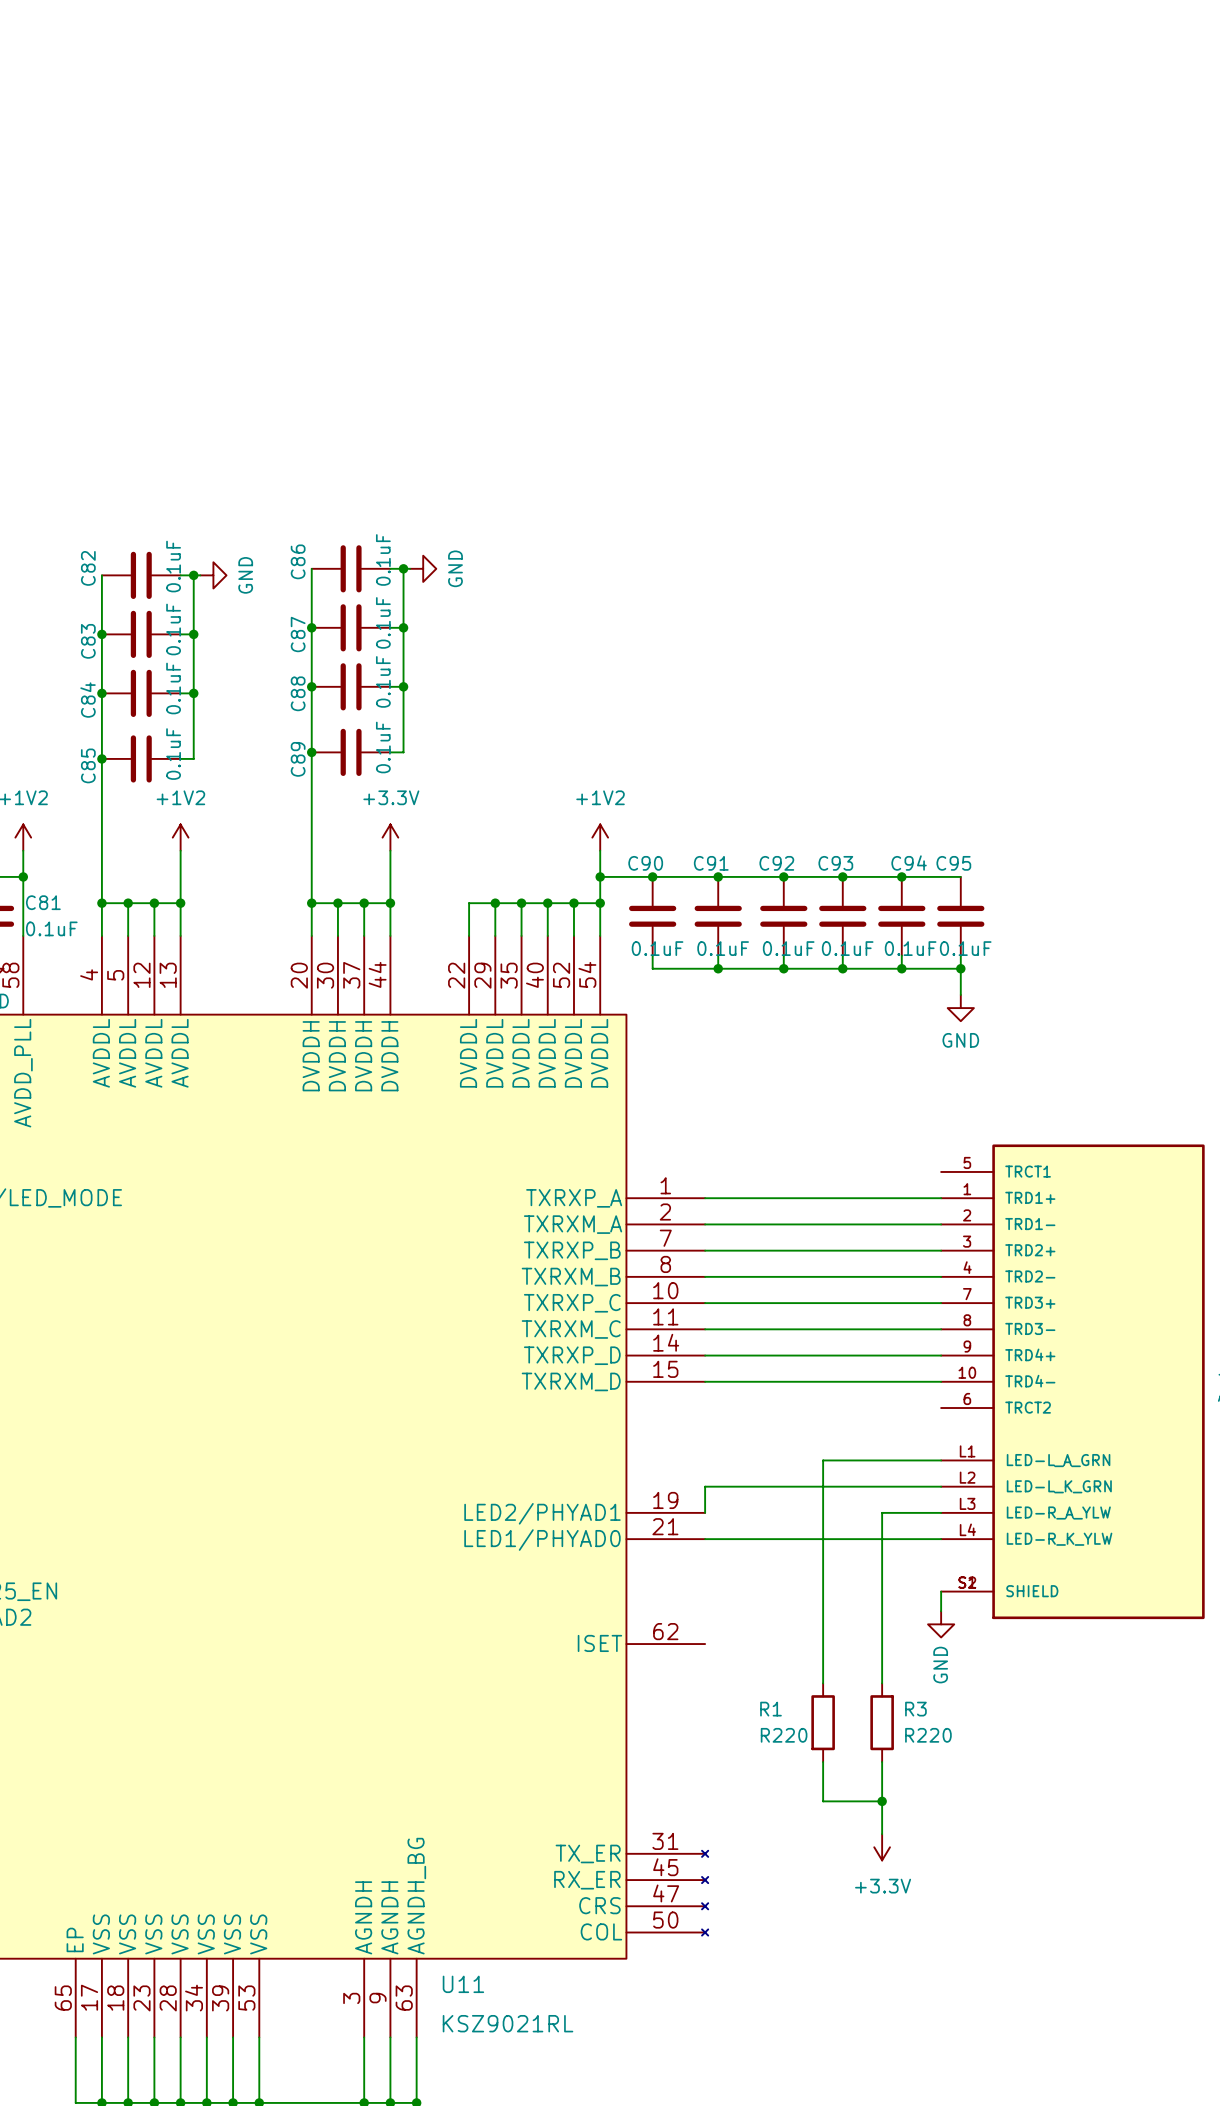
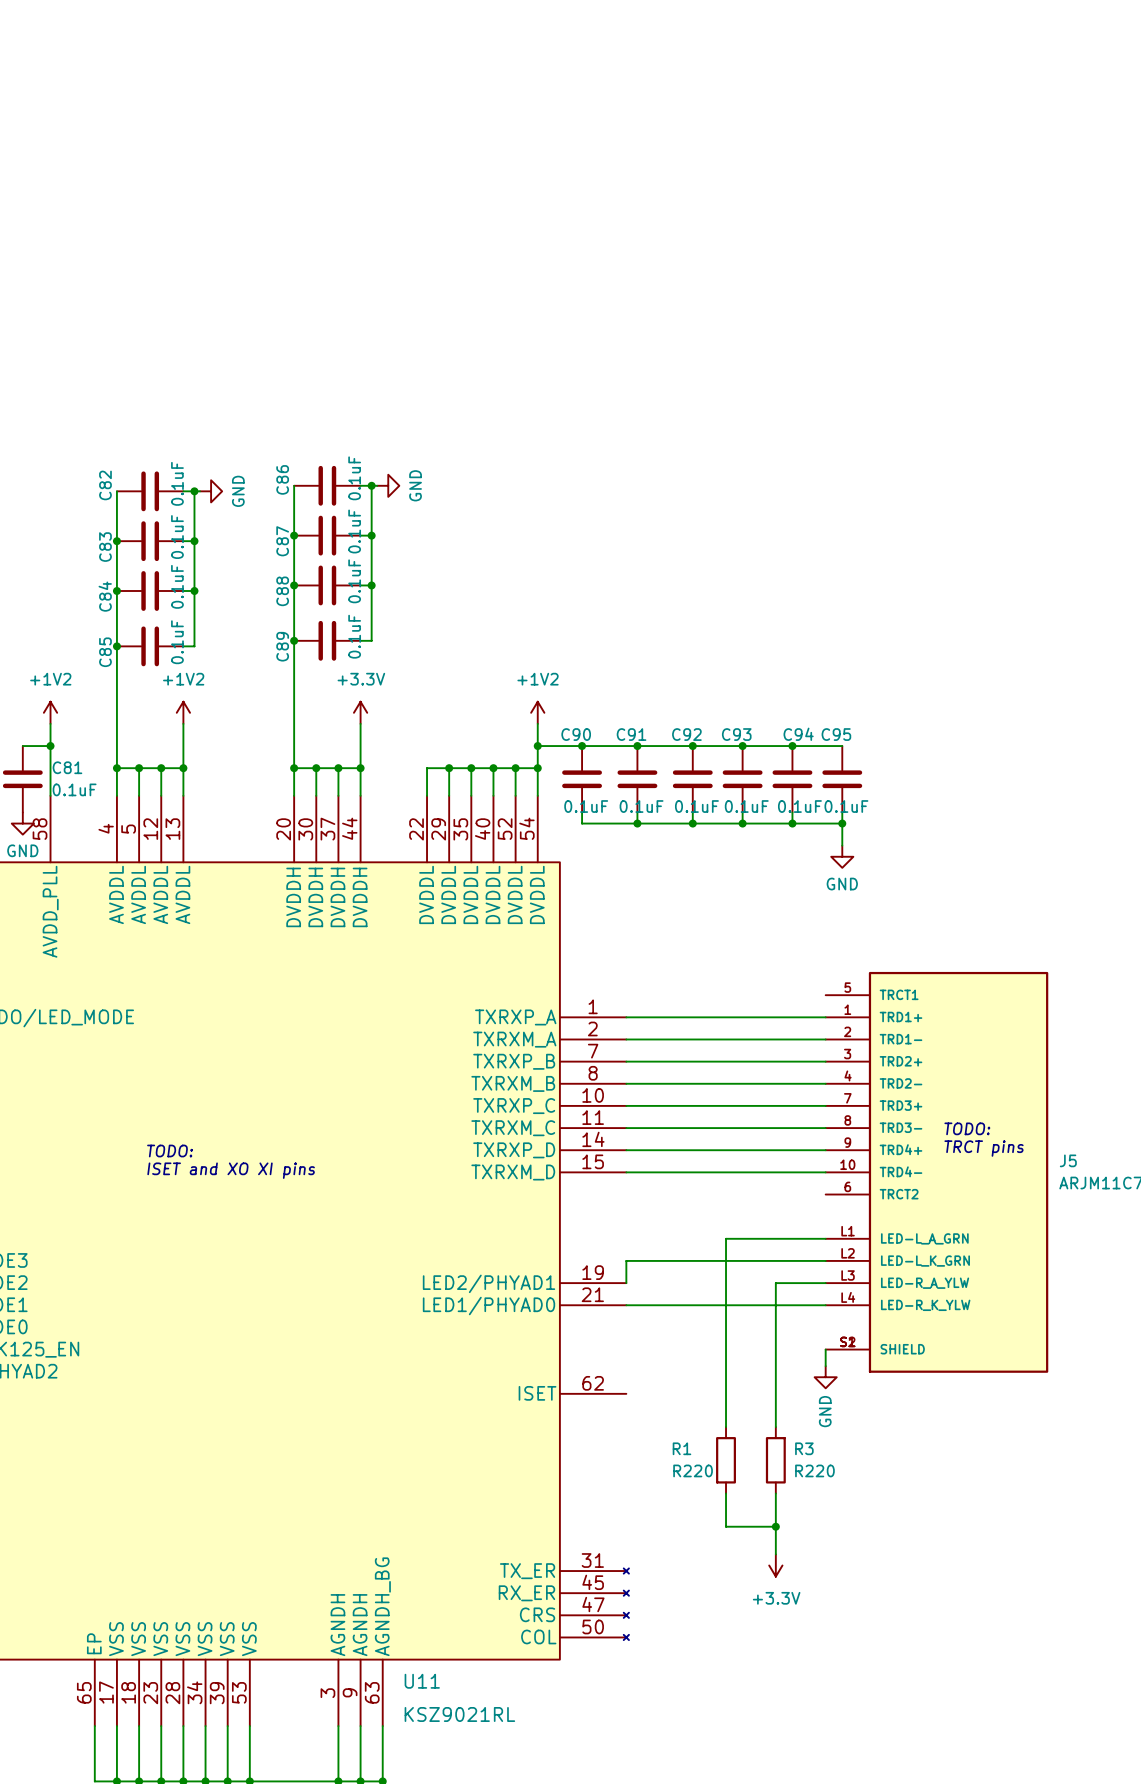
text: none -> TODO: (967, 1128)
text: none -> TRCT pins (984, 1148)
text: none -> TODO: (170, 1151)
text: none -> ISET and XO XI pins (231, 1170)

